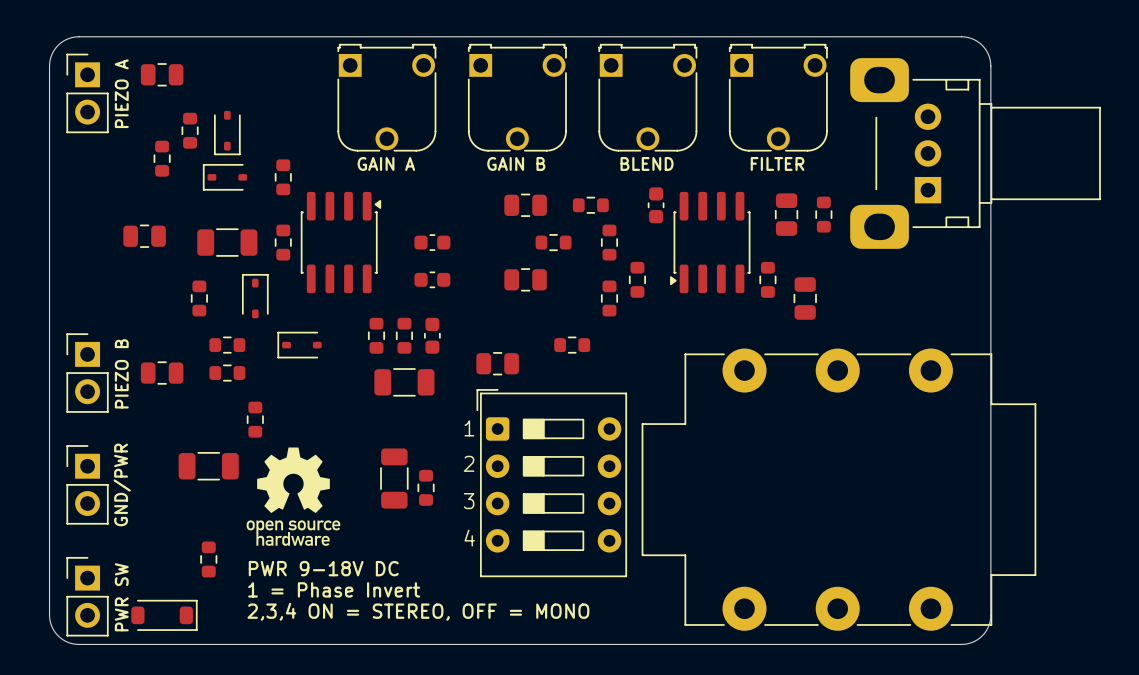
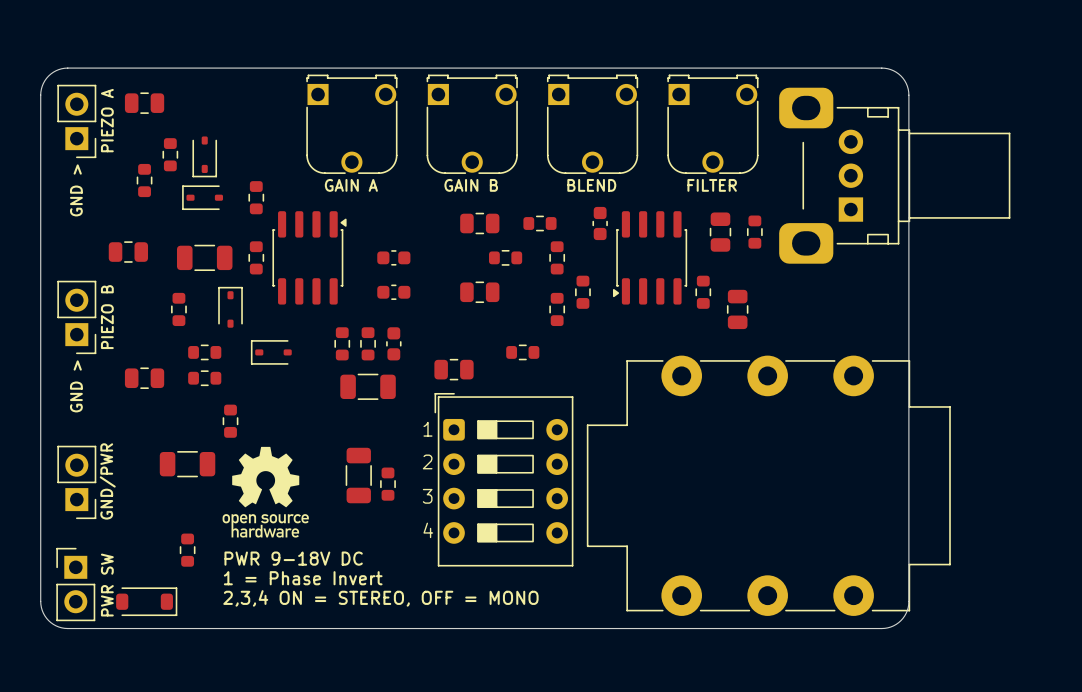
part rotation: 0° (87, 93) -> 180° (76, 121)
text: none -> GND > (76, 190)
part rotation: 0° (87, 373) -> 180° (76, 317)
part position: (87, 373) -> (76, 317)
text position: PIEZO B (121, 373) -> PIEZO B (107, 317)
text: none -> GND > (76, 386)
part rotation: 0° (87, 484) -> 180° (76, 482)

